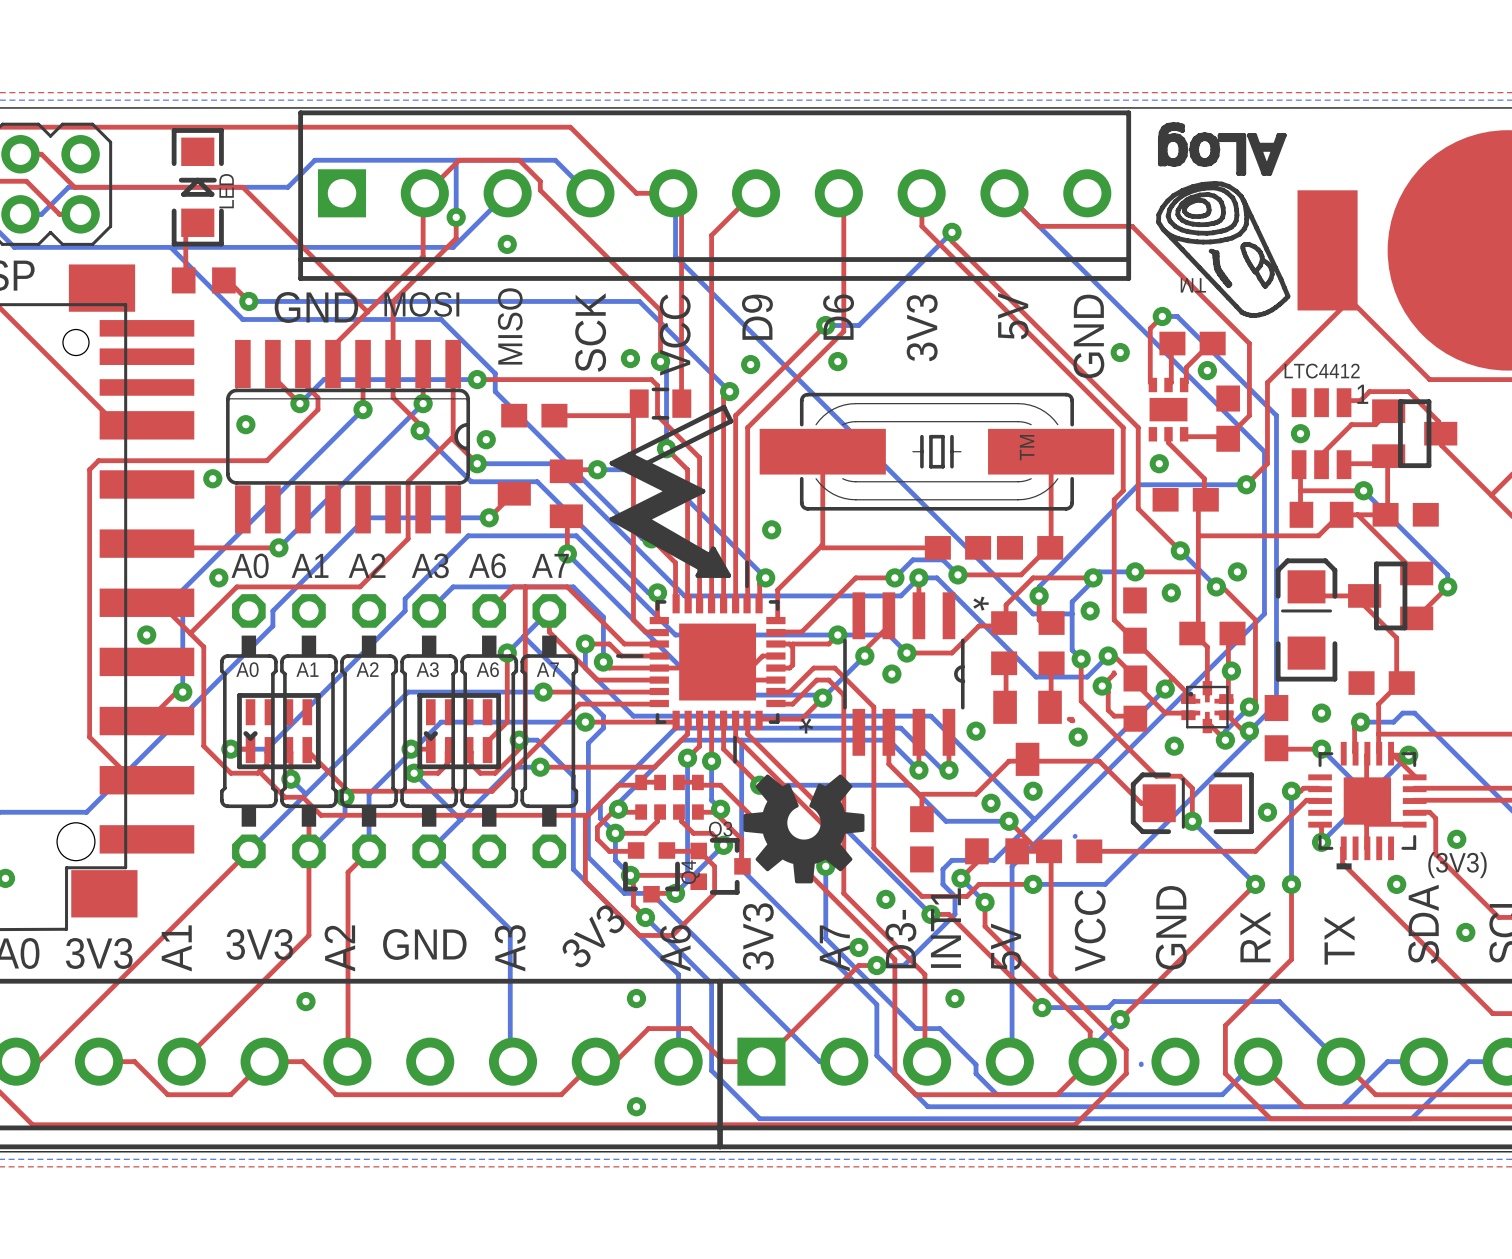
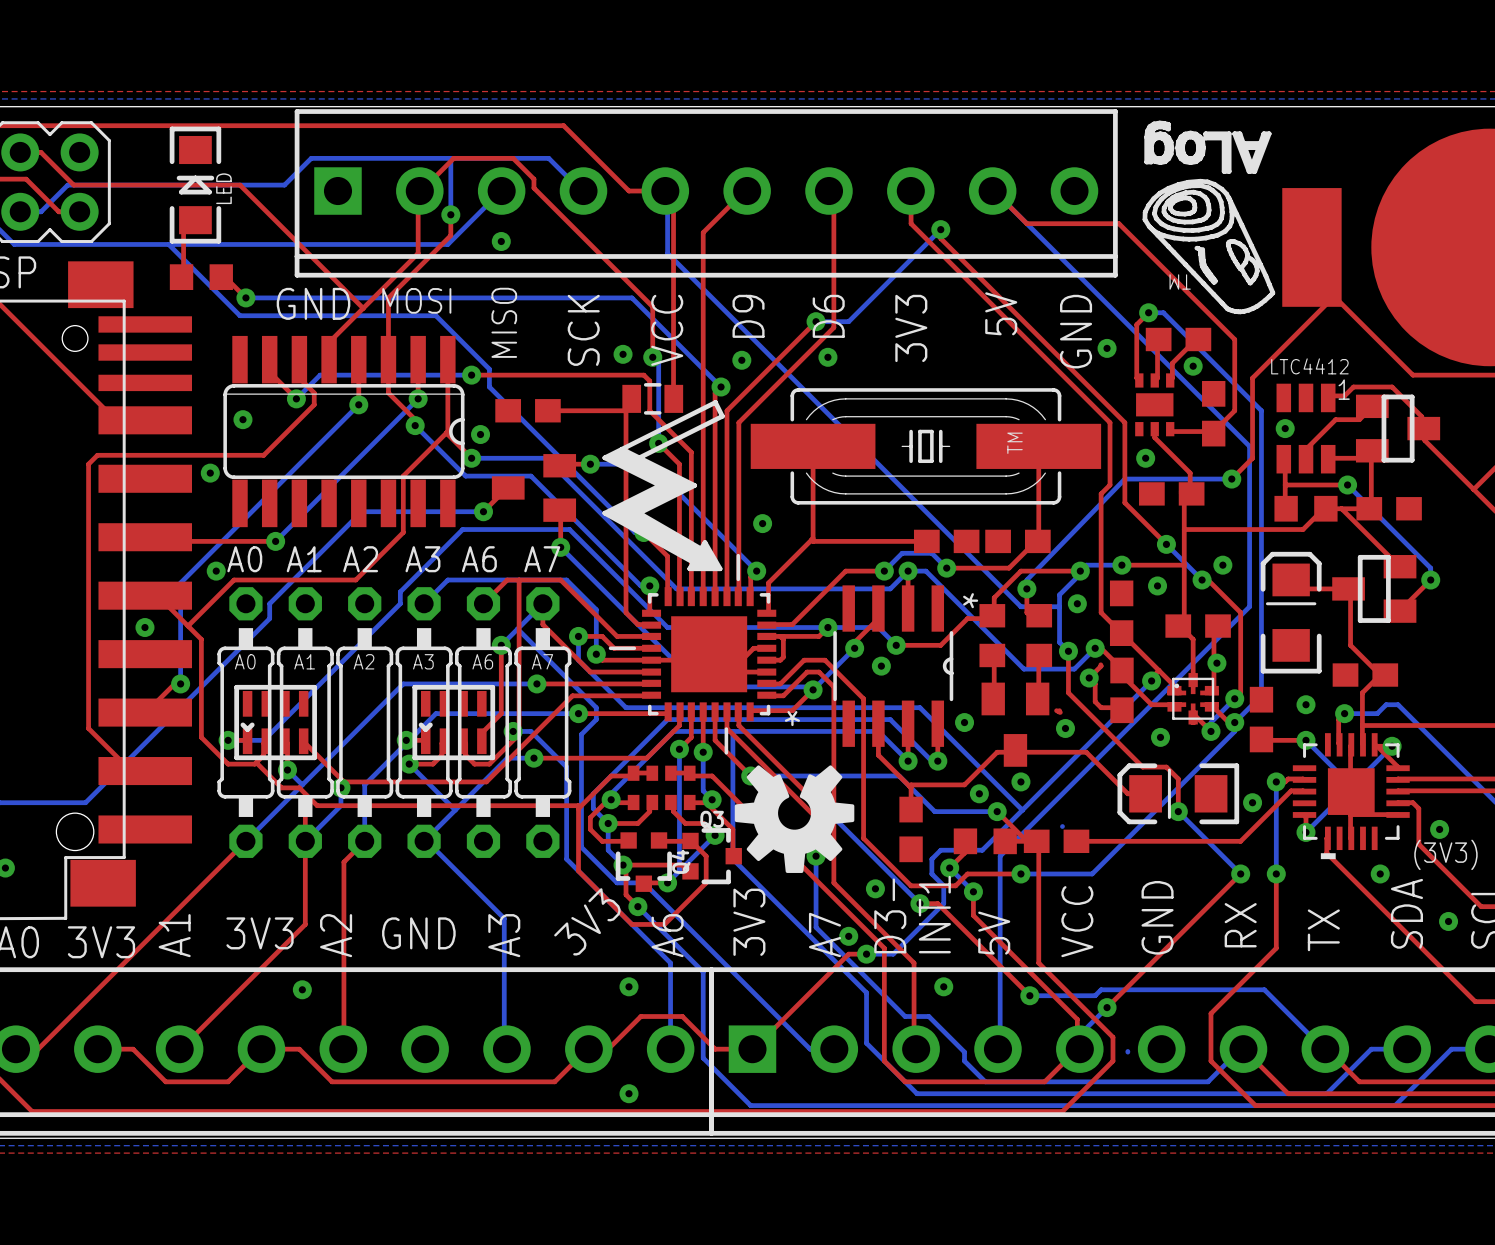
top track: (1354, 595) (1396, 638) (1396, 683) -> none
top track: (1399, 683) (1378, 704) -> (1348, 588) (1350, 588) (1350, 645) (1380, 675) (1362, 692) (1362, 695)

